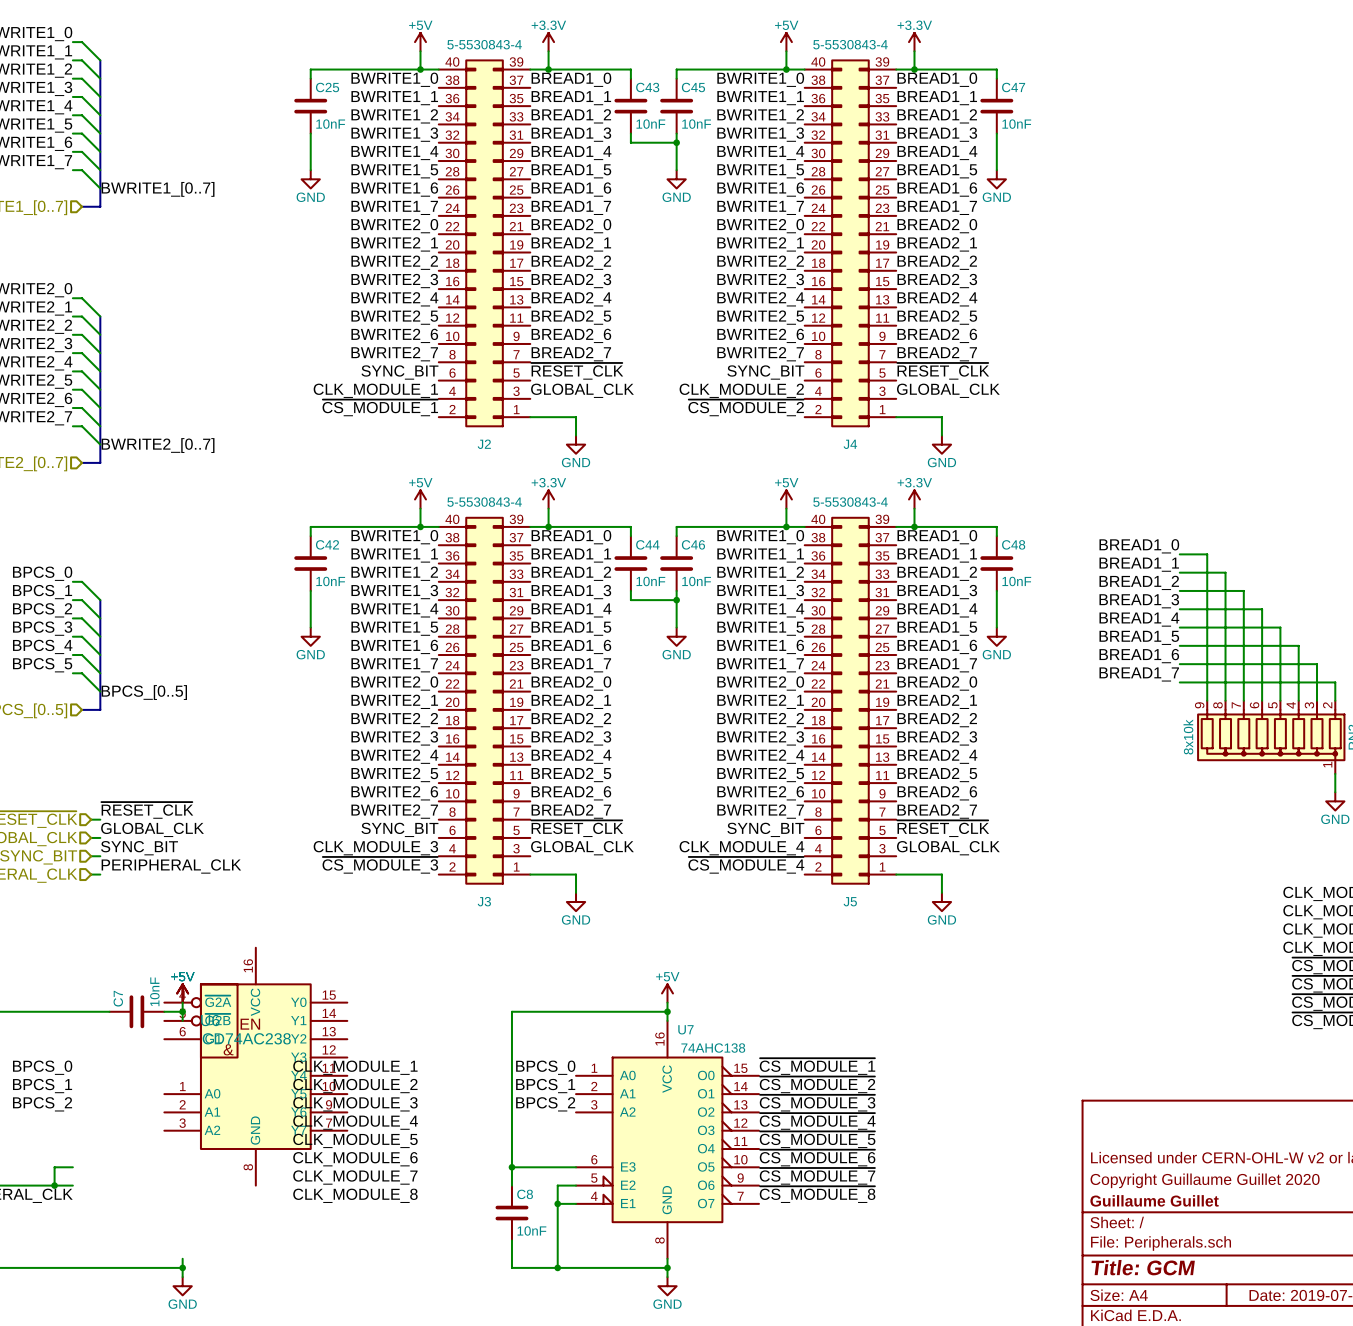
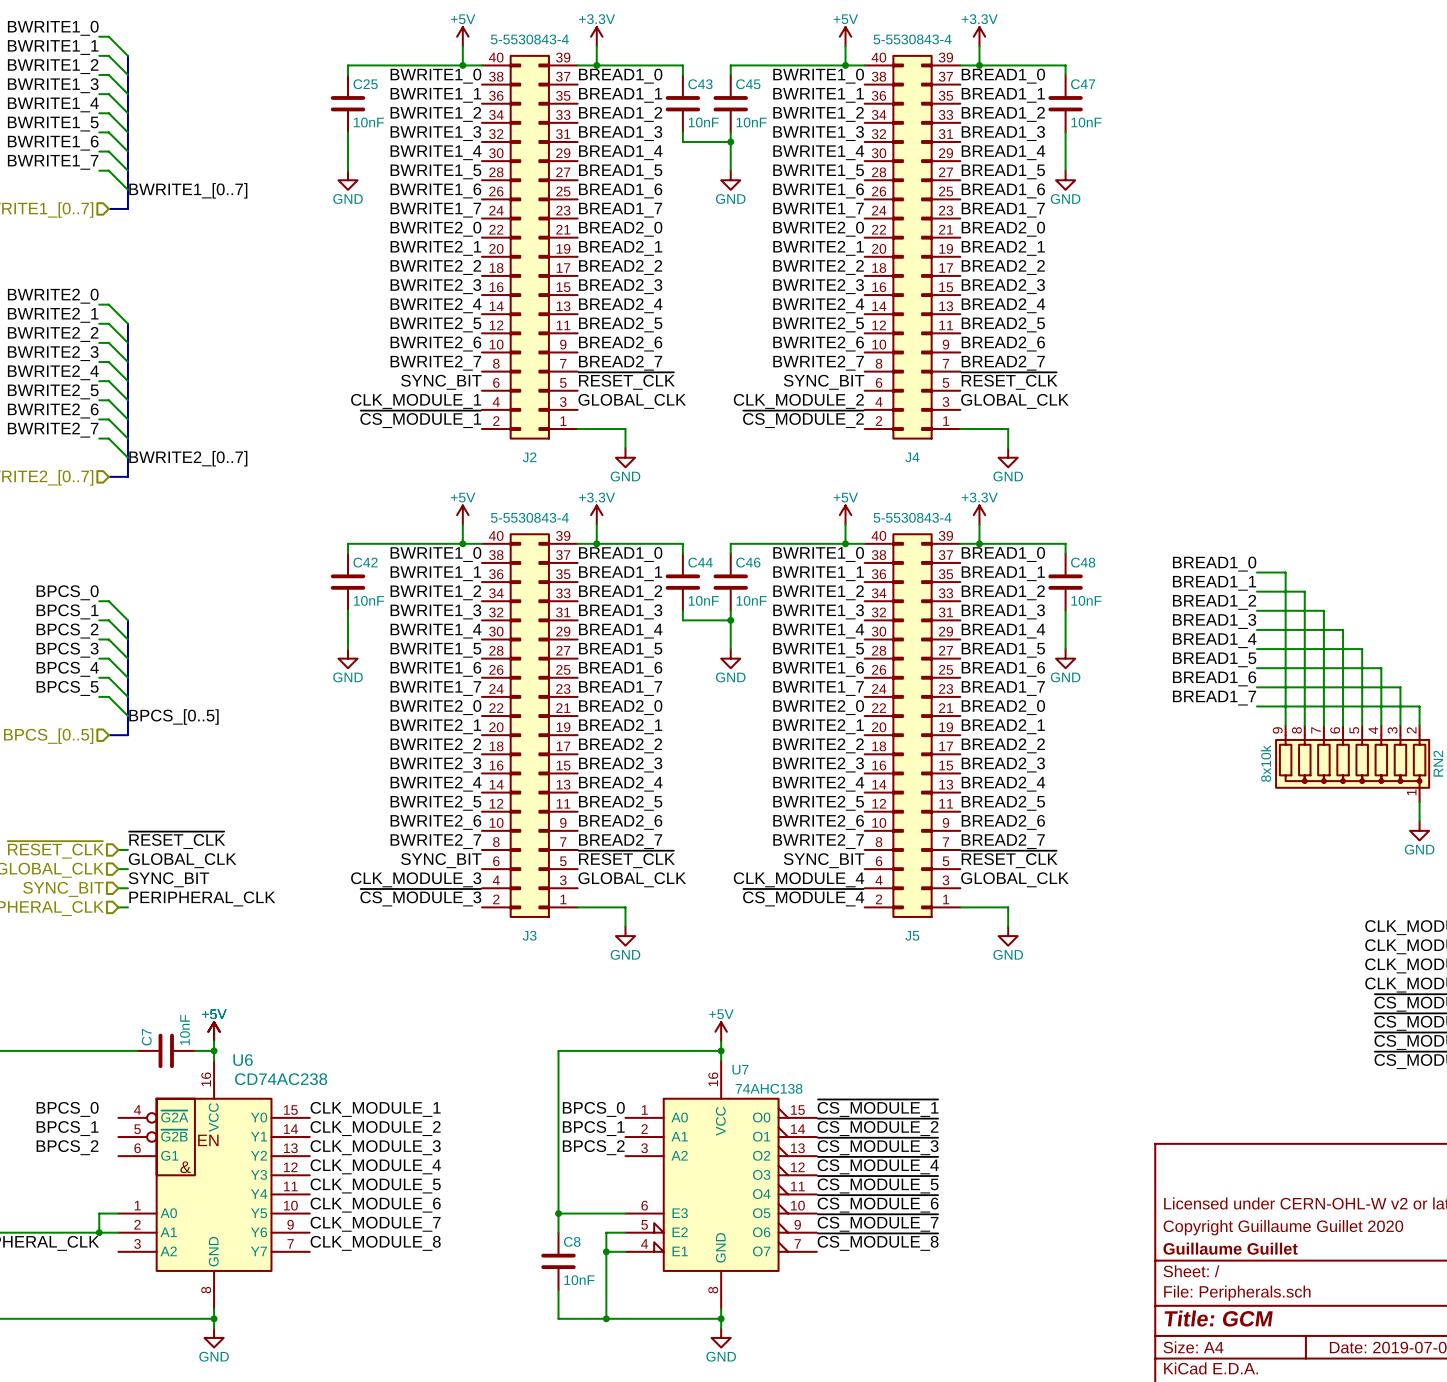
U6 position: (255, 1066) -> (214, 1184)
label position: CLK_MODULE_1 (355, 1067) -> CLK_MODULE_1 (375, 1109)
label position: CLK_MODULE_2 (355, 1086) -> CLK_MODULE_2 (375, 1128)
label position: CLK_MODULE_3 (355, 1104) -> CLK_MODULE_3 (375, 1147)
label position: CLK_MODULE_4 (355, 1122) -> CLK_MODULE_4 (375, 1166)
label position: CLK_MODULE_5 (355, 1140) -> CLK_MODULE_5 (375, 1185)
label position: CLK_MODULE_6 (355, 1159) -> CLK_MODULE_6 (375, 1205)
wire: (72, 1167) (54, 1167) (54, 1185) -> none
wire: none -> (118, 1213) (99, 1213) (99, 1232) (118, 1232)
label position: CLK_MODULE_7 (355, 1177) -> CLK_MODULE_7 (375, 1224)
junction position: (54, 1185) -> (99, 1232)
label position: CLK_MODULE_8 (355, 1195) -> CLK_MODULE_8 (375, 1243)

